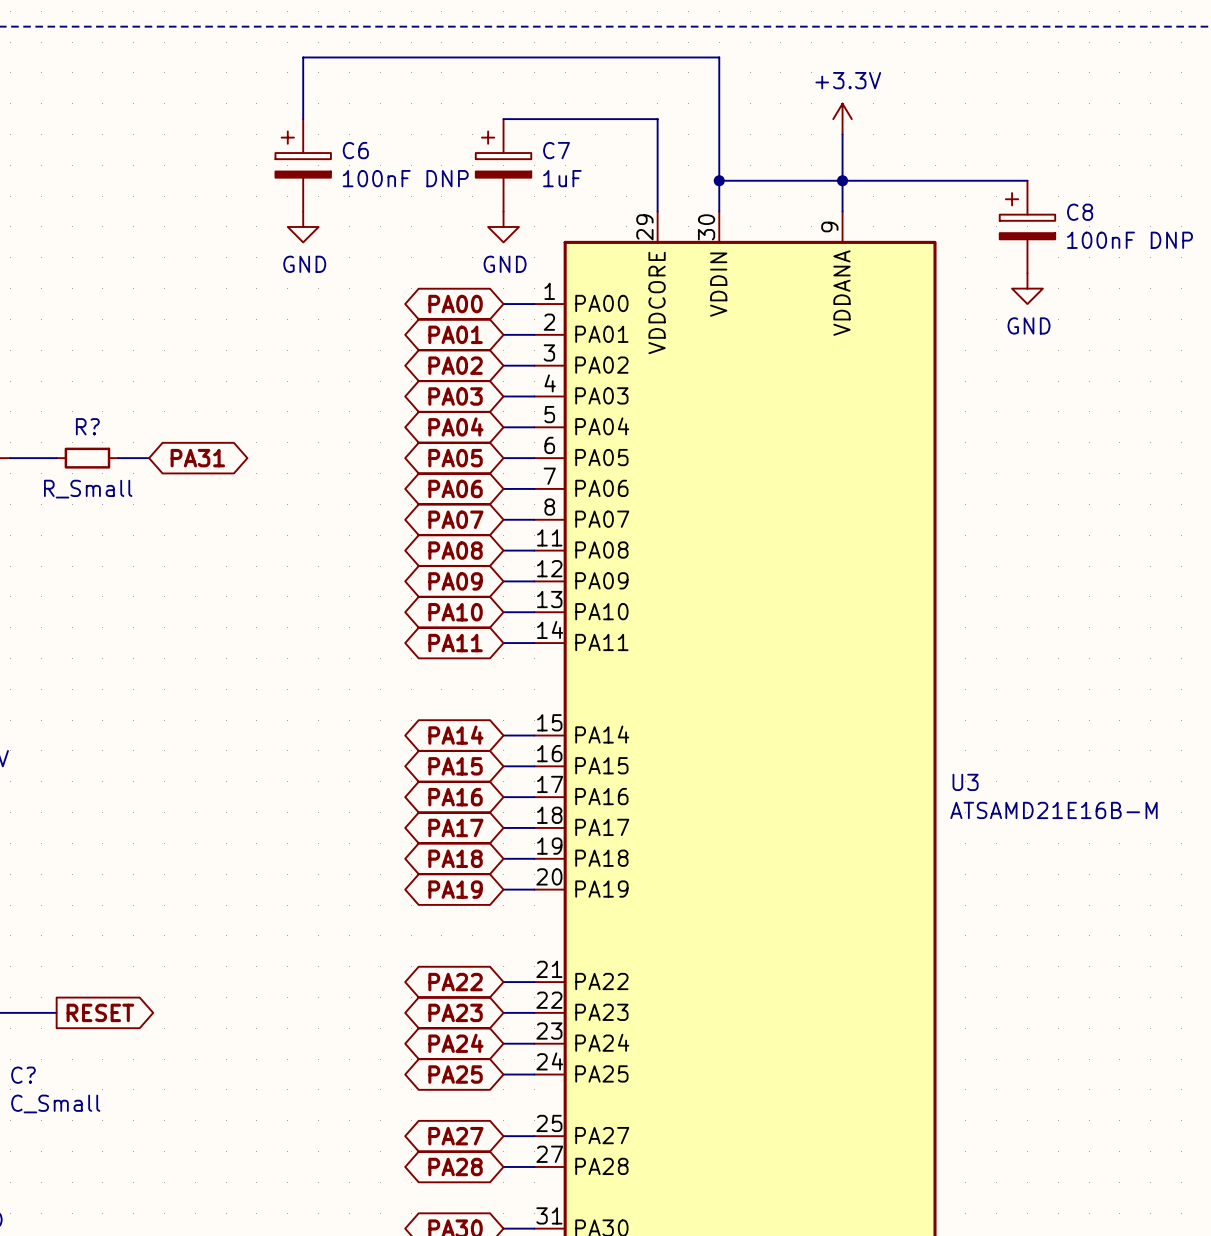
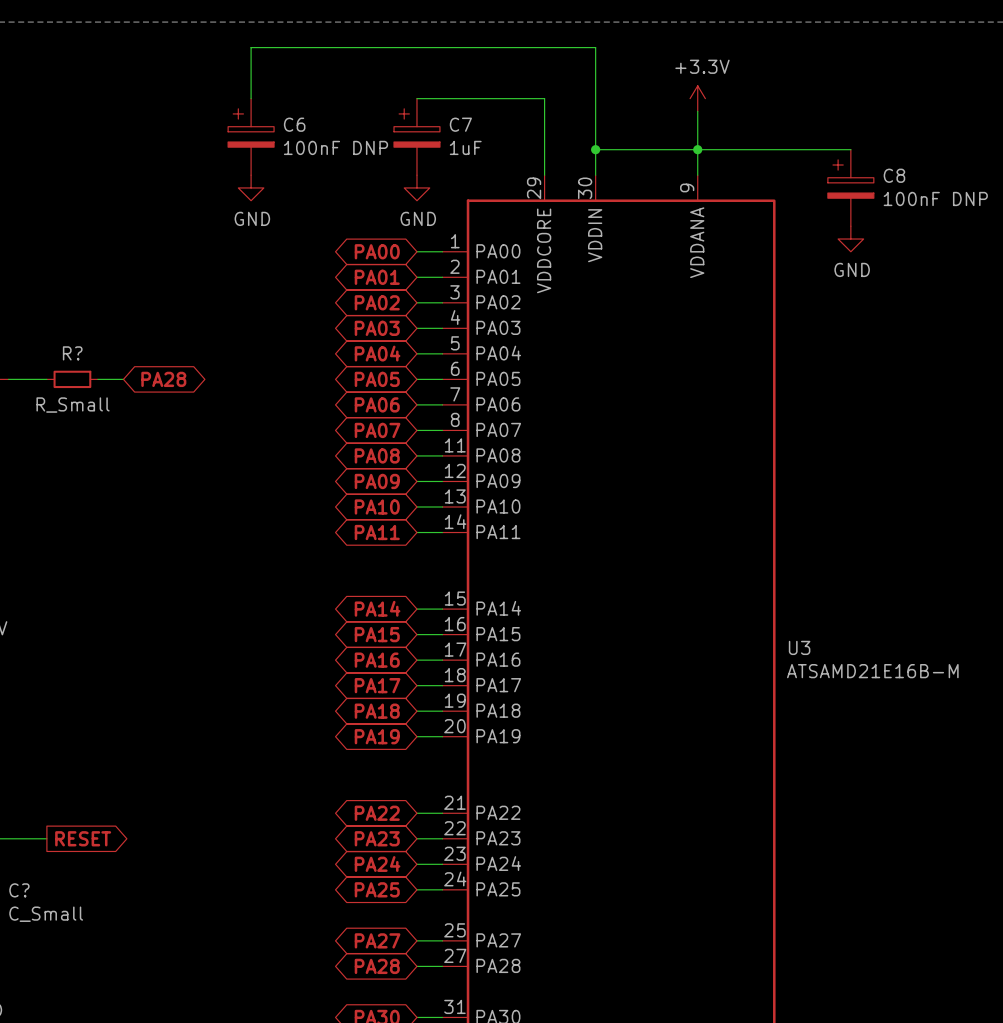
global label: PA31 (197, 458) -> PA28 (163, 379)

